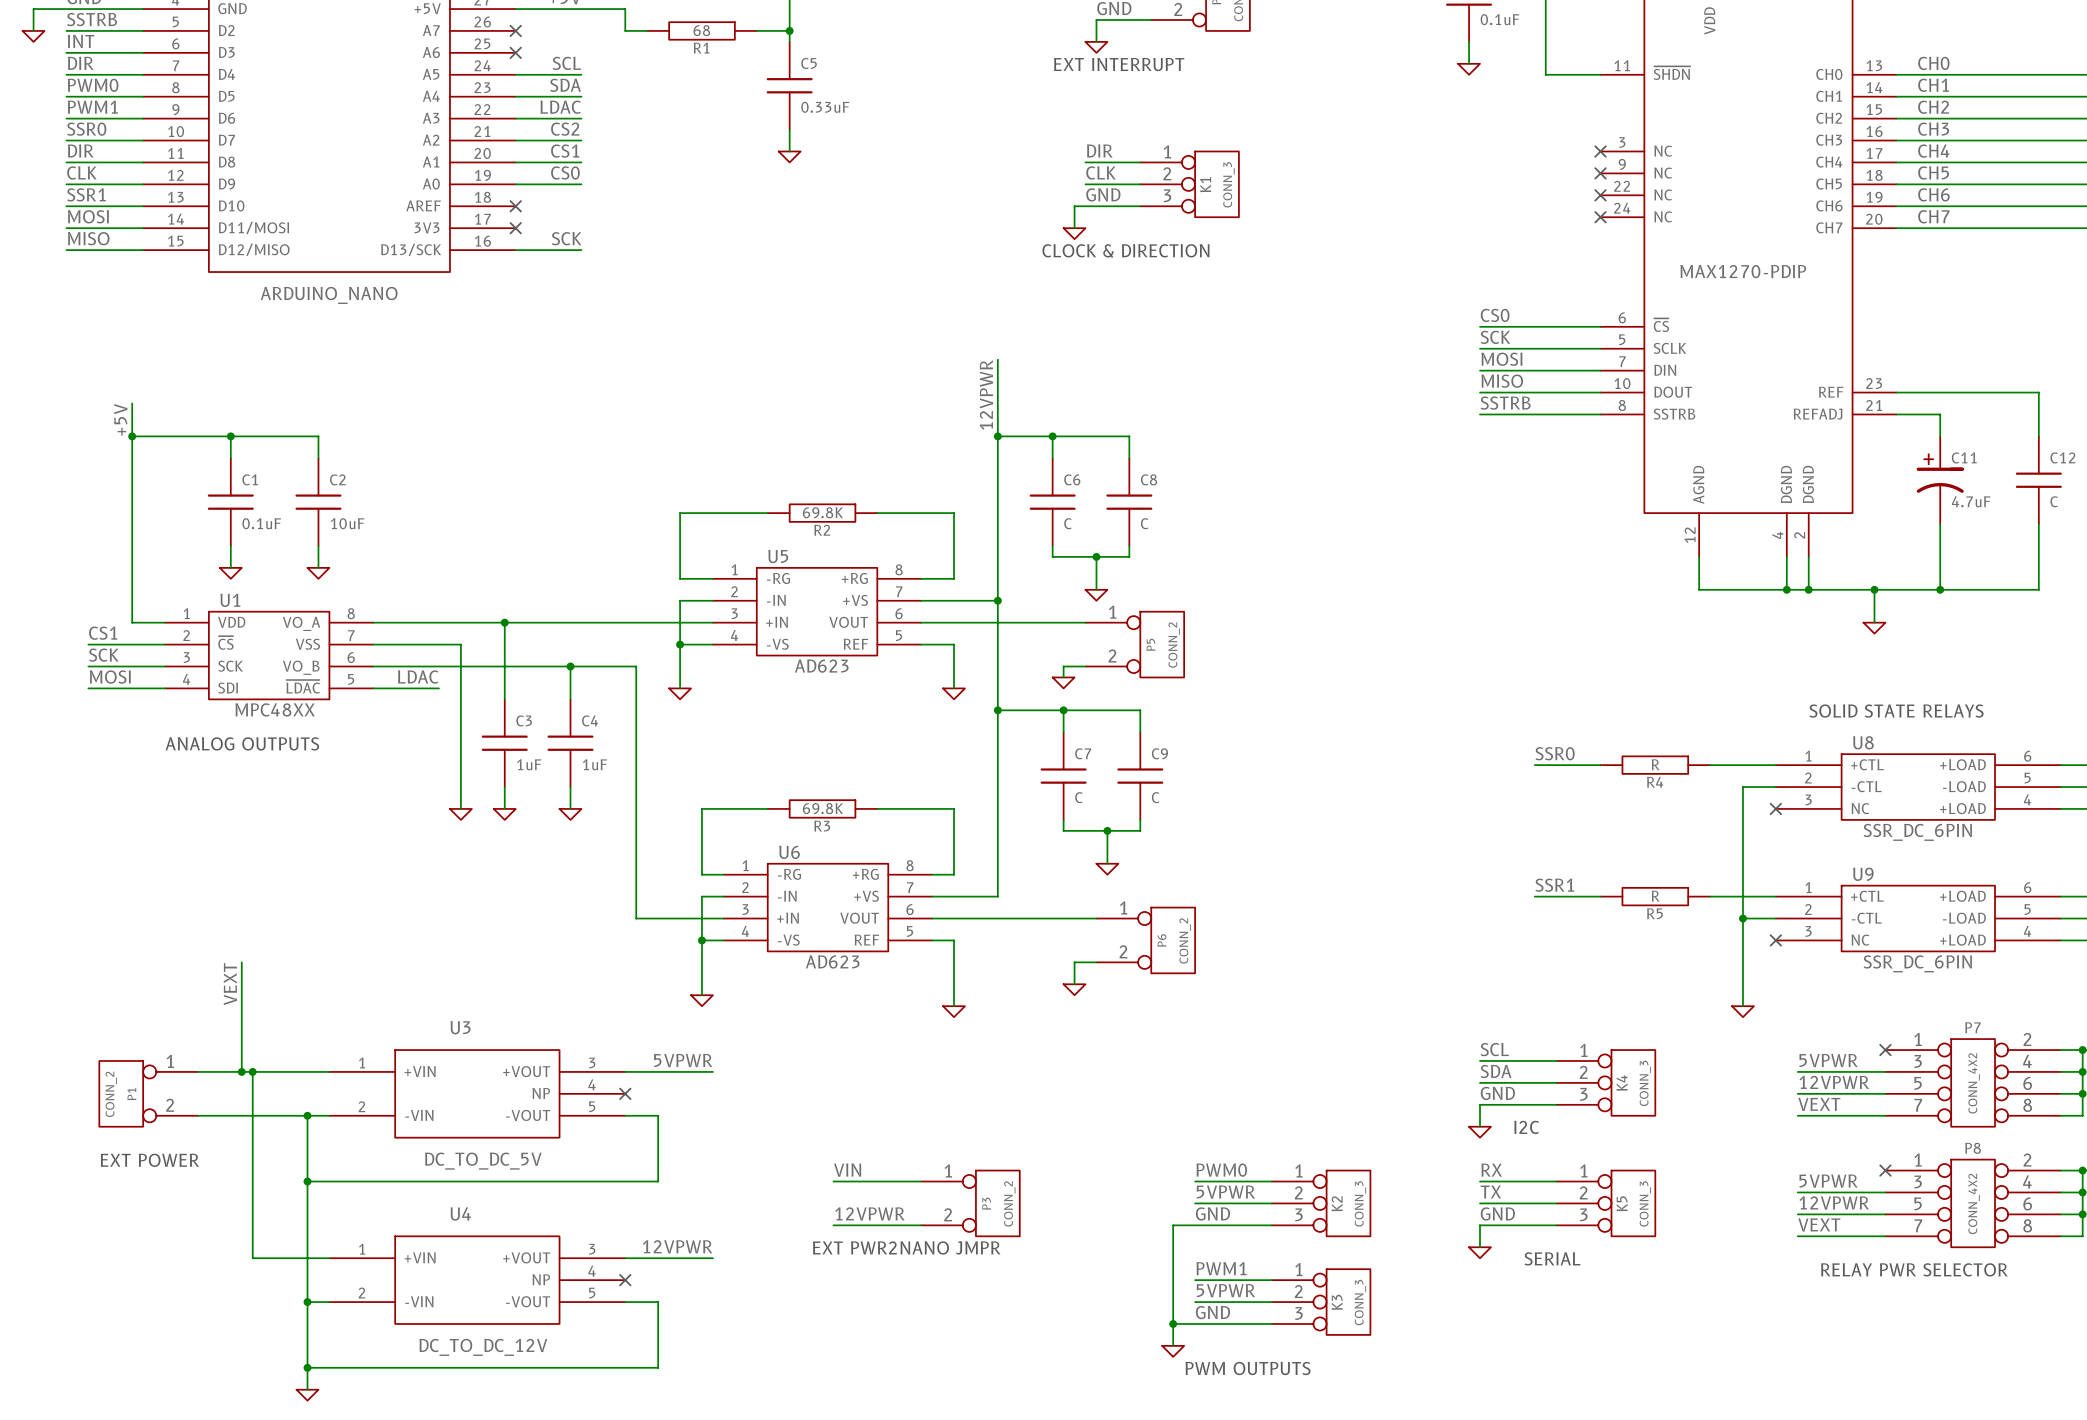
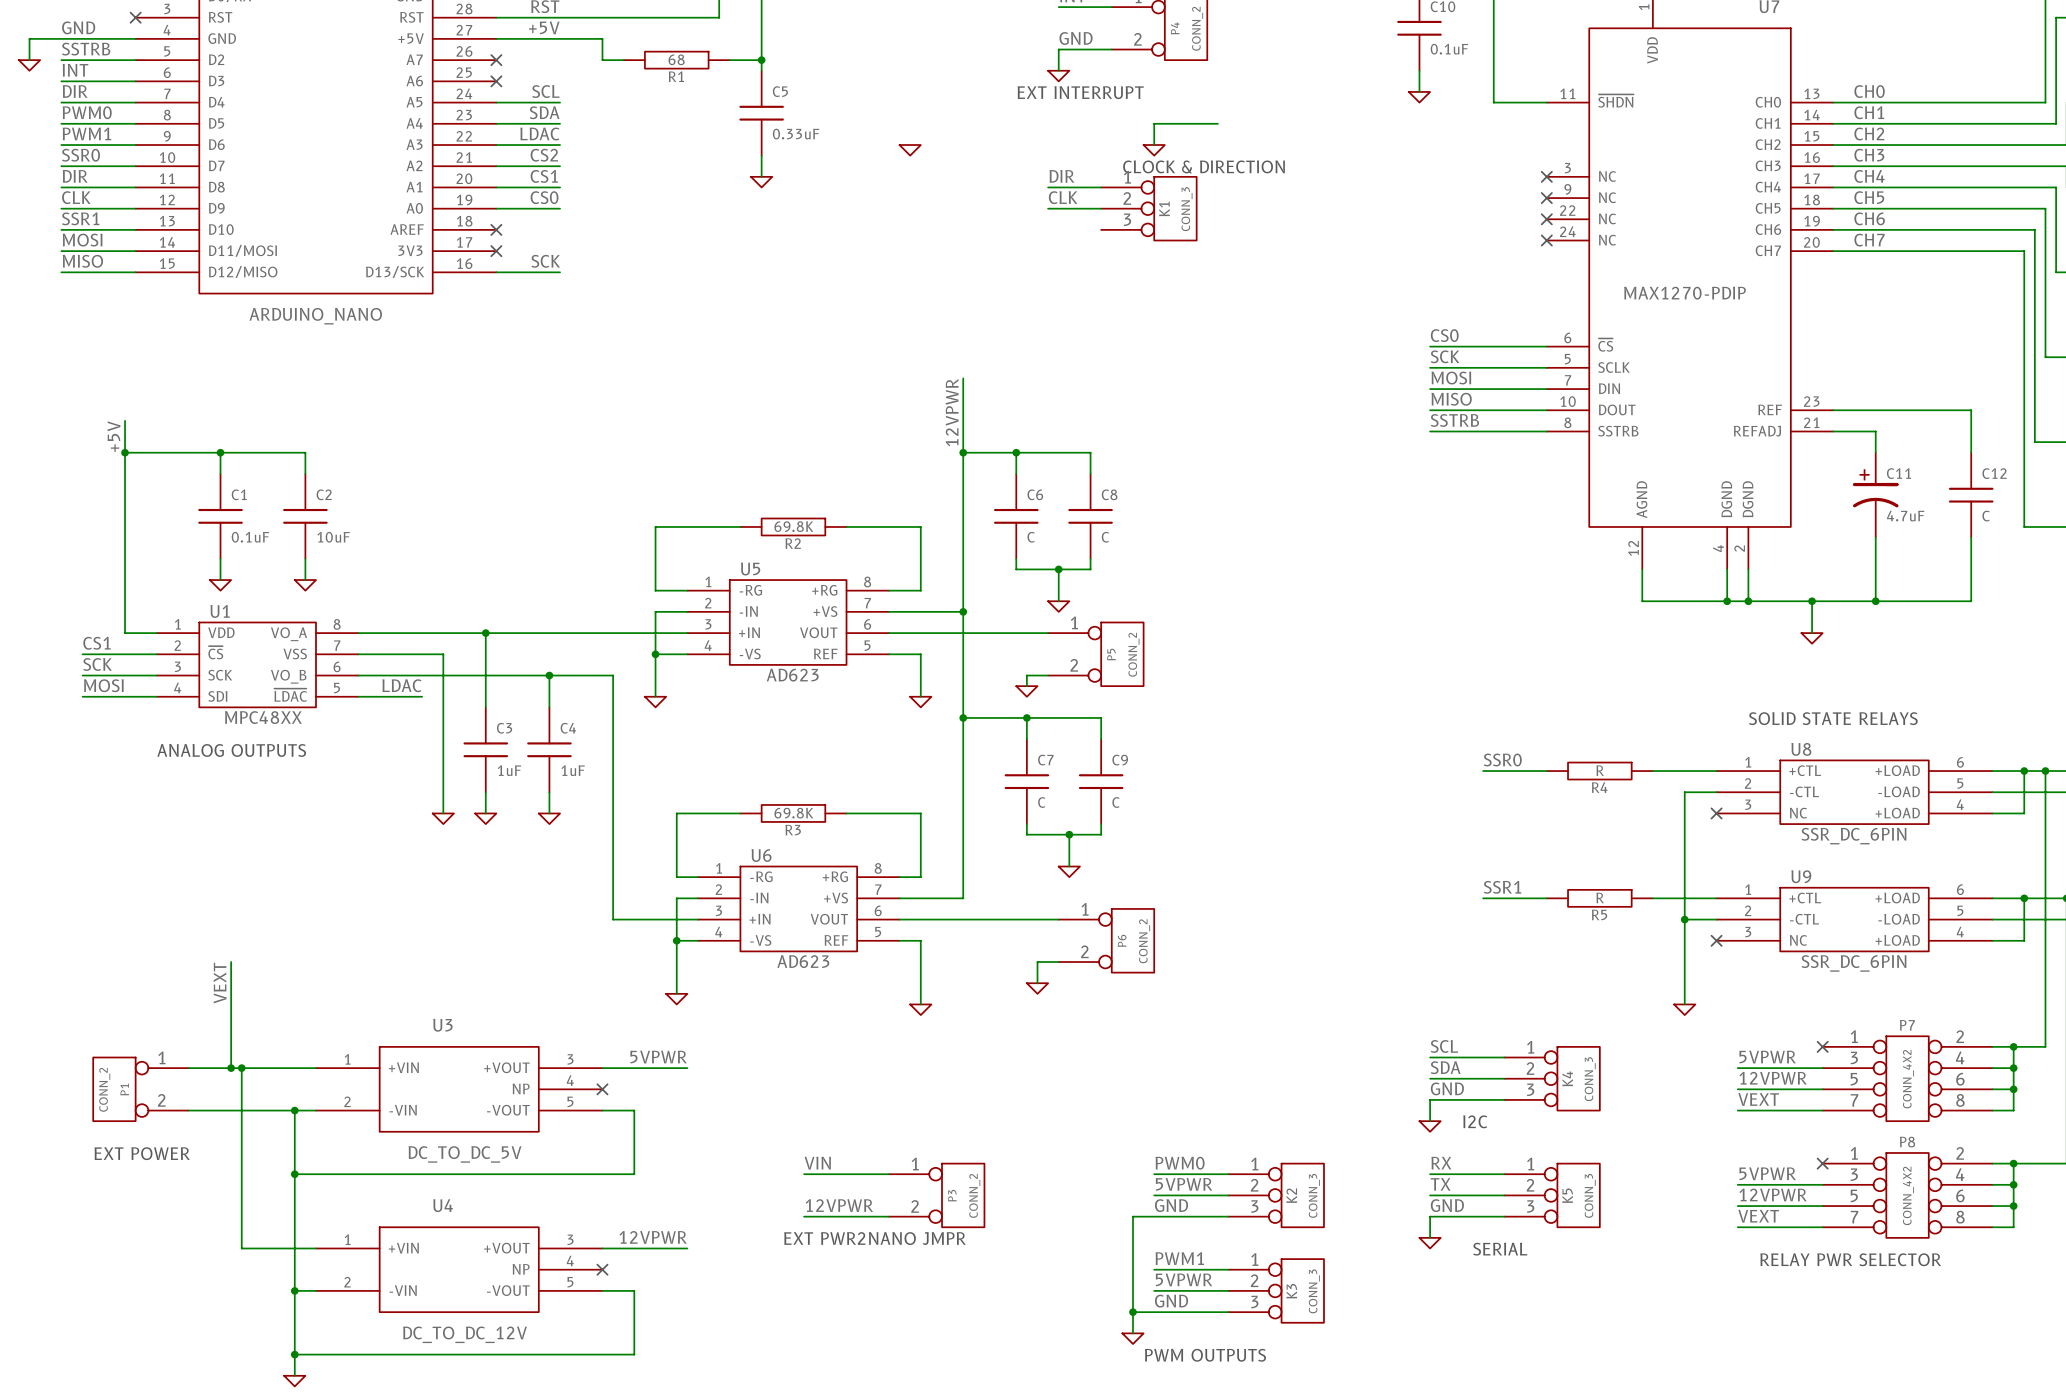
power symbol: none -> (910, 150)
power symbol: none -> (1154, 150)
label: GND (1103, 194) -> none
wire: (1140, 206) (1074, 206) (1074, 228) -> (1217, 123) (1154, 123) (1154, 145)
power symbol: (1074, 233) -> none
text position: CLOCK & DIRECTION (1125, 250) -> CLOCK & DIRECTION (1203, 166)

